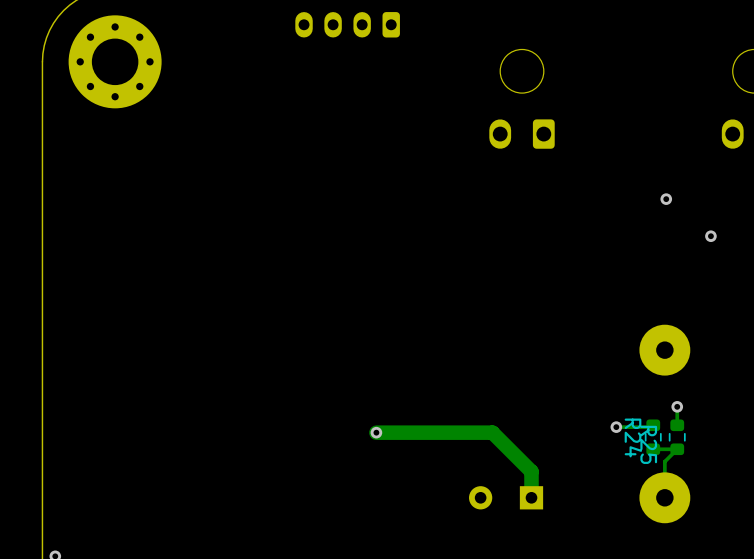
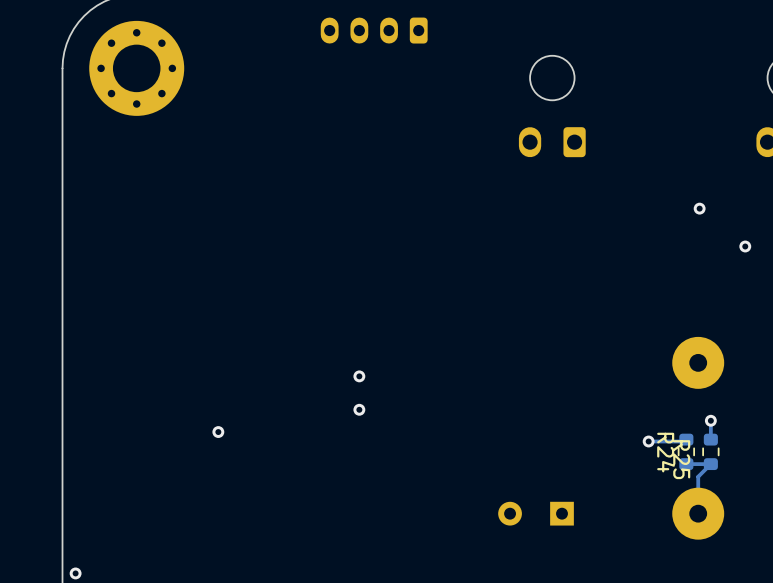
via: none -> (359, 376)
via: none -> (359, 409)
via: none -> (218, 432)
track: (376, 432) (492, 432) (531, 471) (531, 497) -> none
via: (376, 432) -> none

